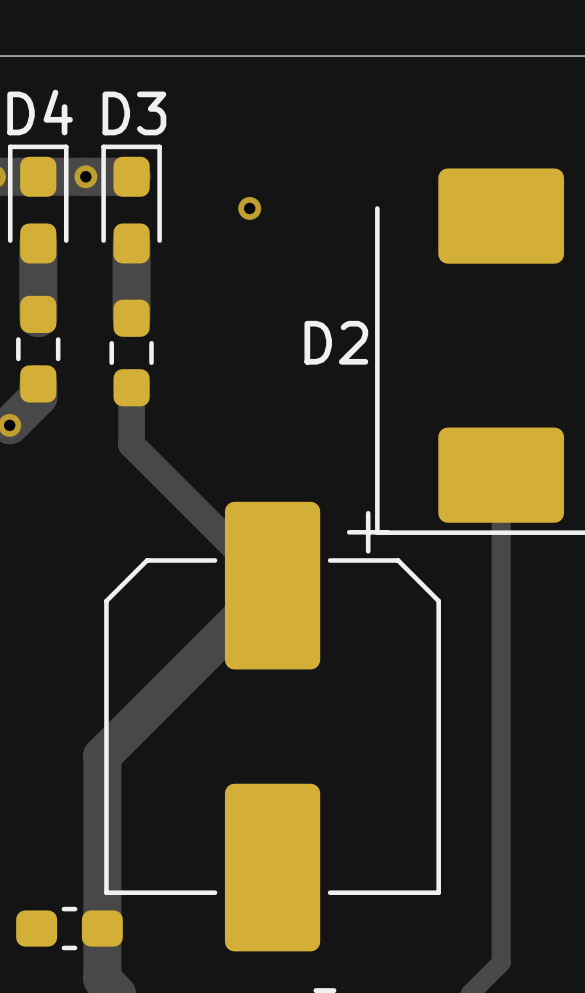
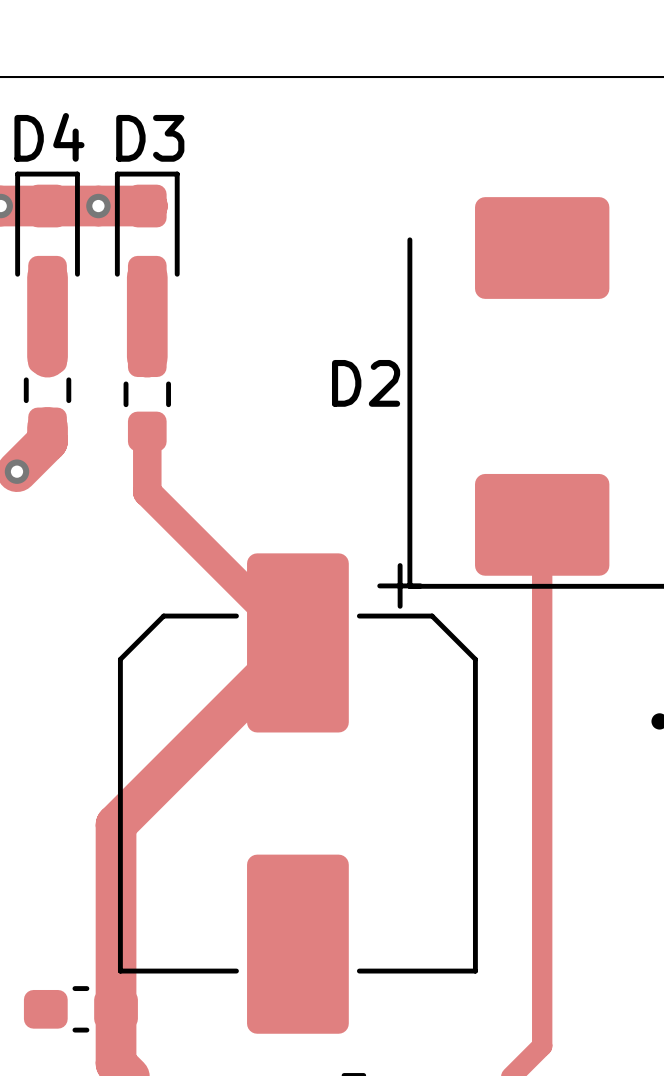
via: (249, 208) -> none

